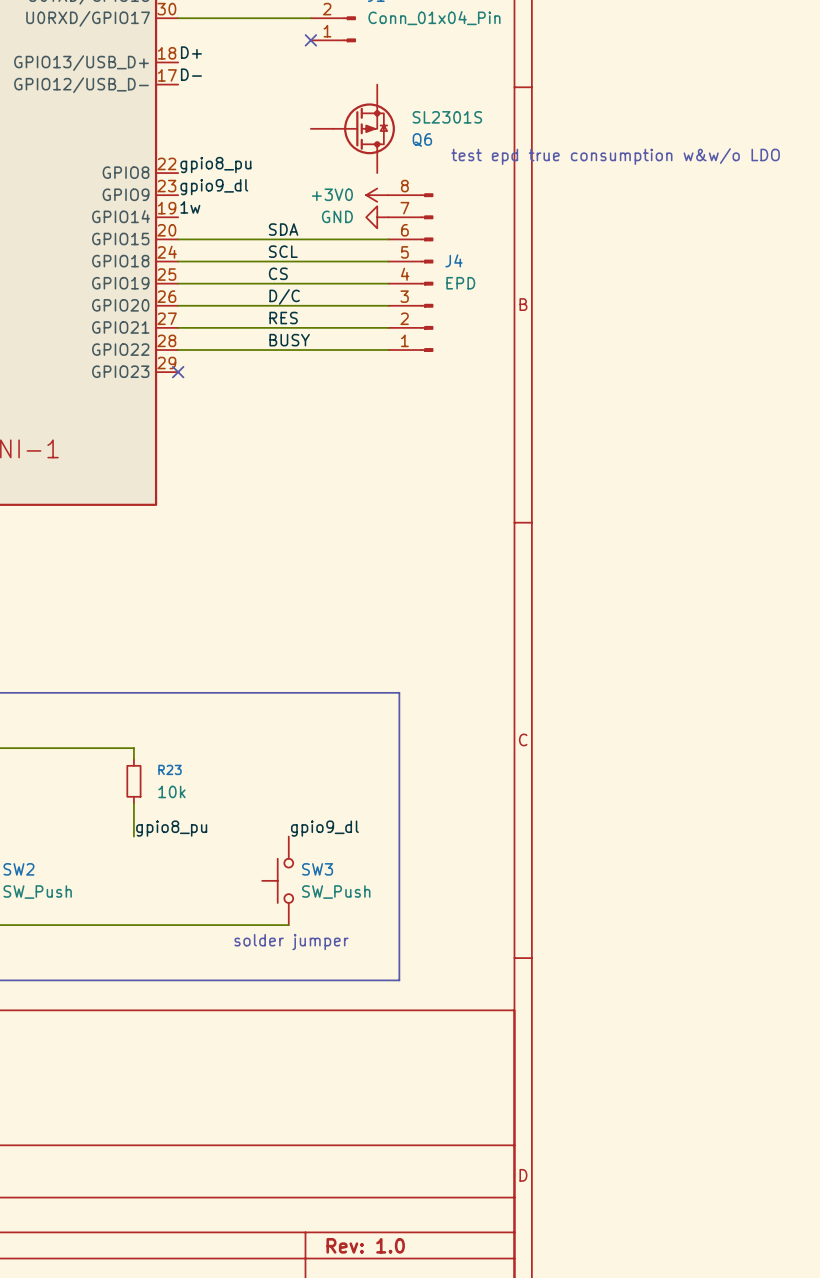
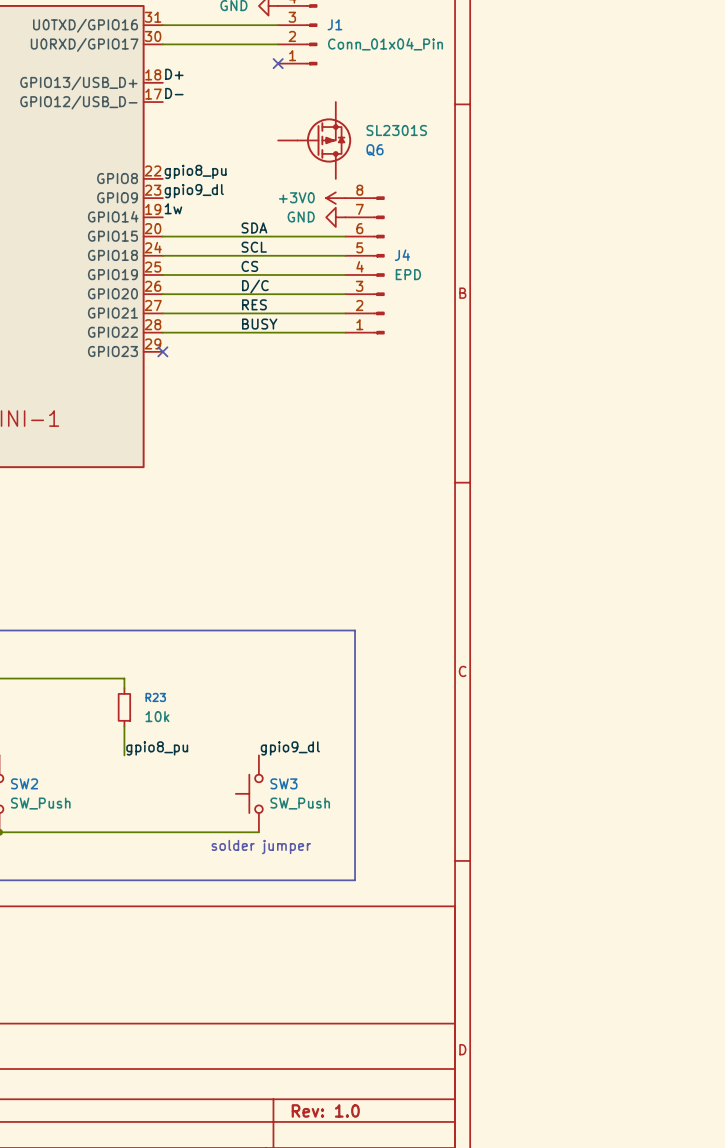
text: test epd true consumption w&w/o LDO (615, 156) -> none

